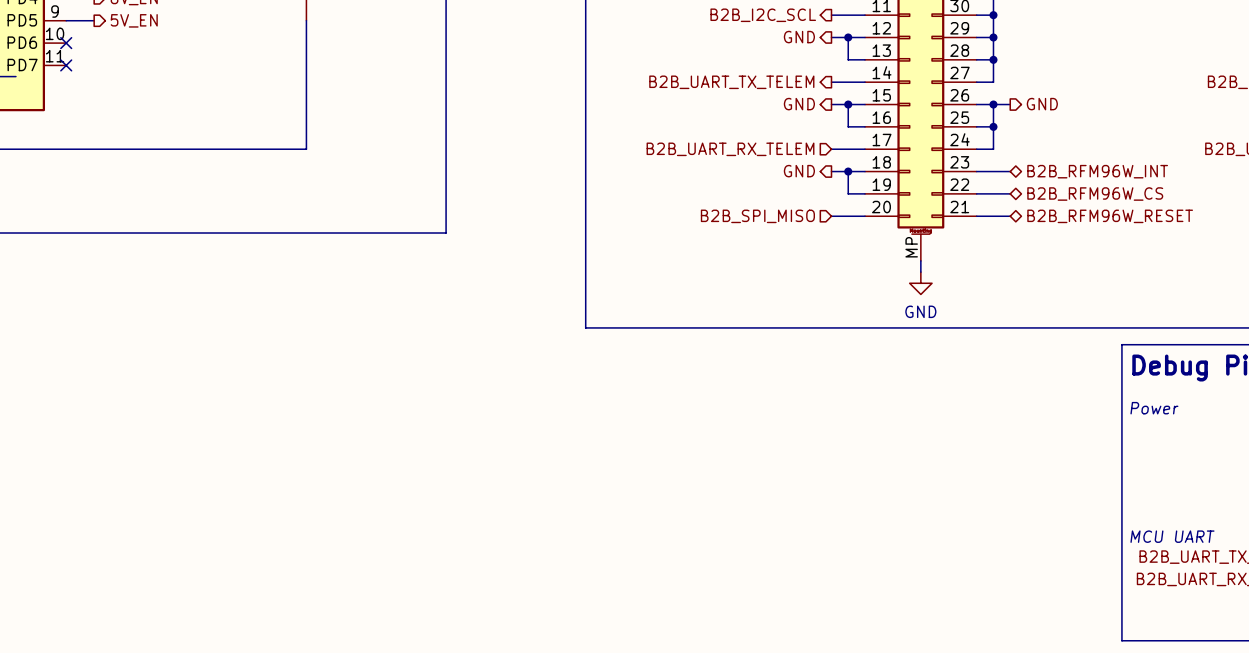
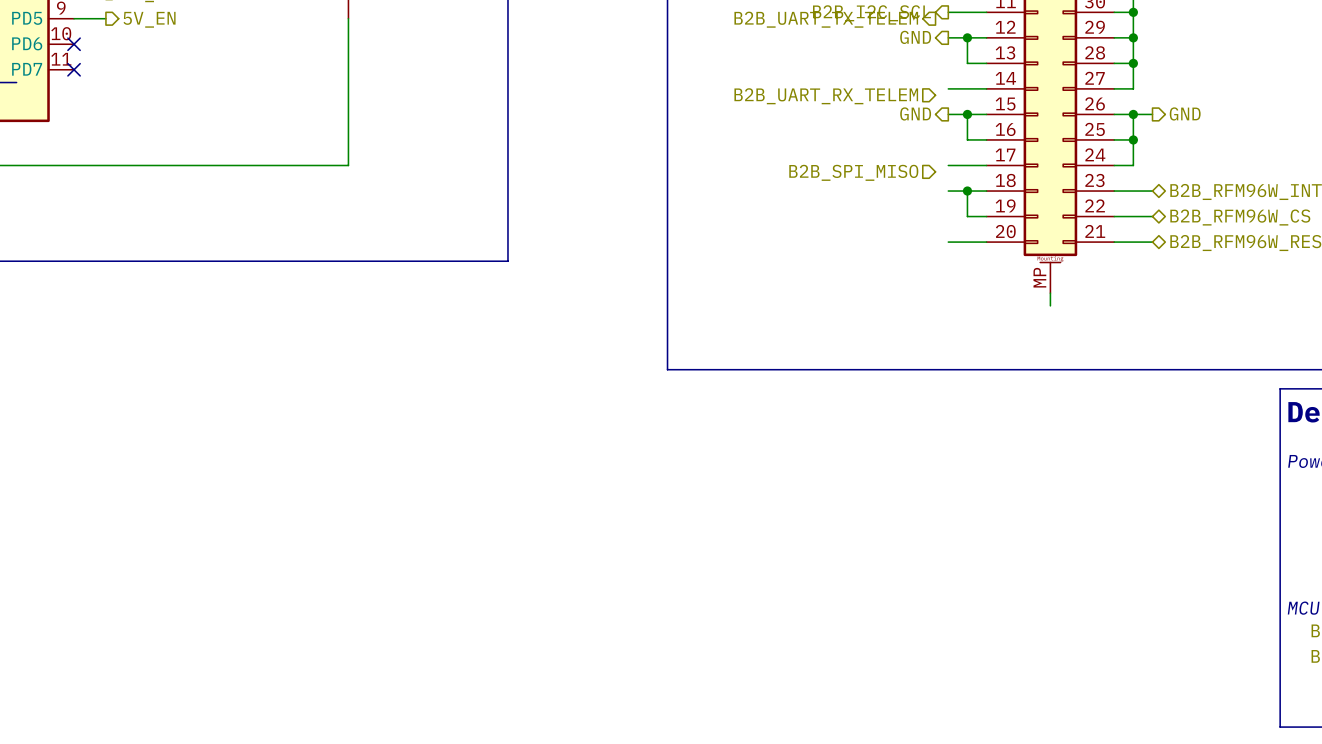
hierarchical label position: B2B_UART_TX_TELEM (731, 82) -> B2B_UART_TX_TELEM (826, 19)
hierarchical label position: B2B_UART_RX_TELEM (730, 149) -> B2B_UART_RX_TELEM (826, 96)
hierarchical label: GND (799, 171) -> none
hierarchical label position: B2B_SPI_MISO (757, 216) -> B2B_SPI_MISO (853, 172)
power symbol: GND (920, 283) -> none

